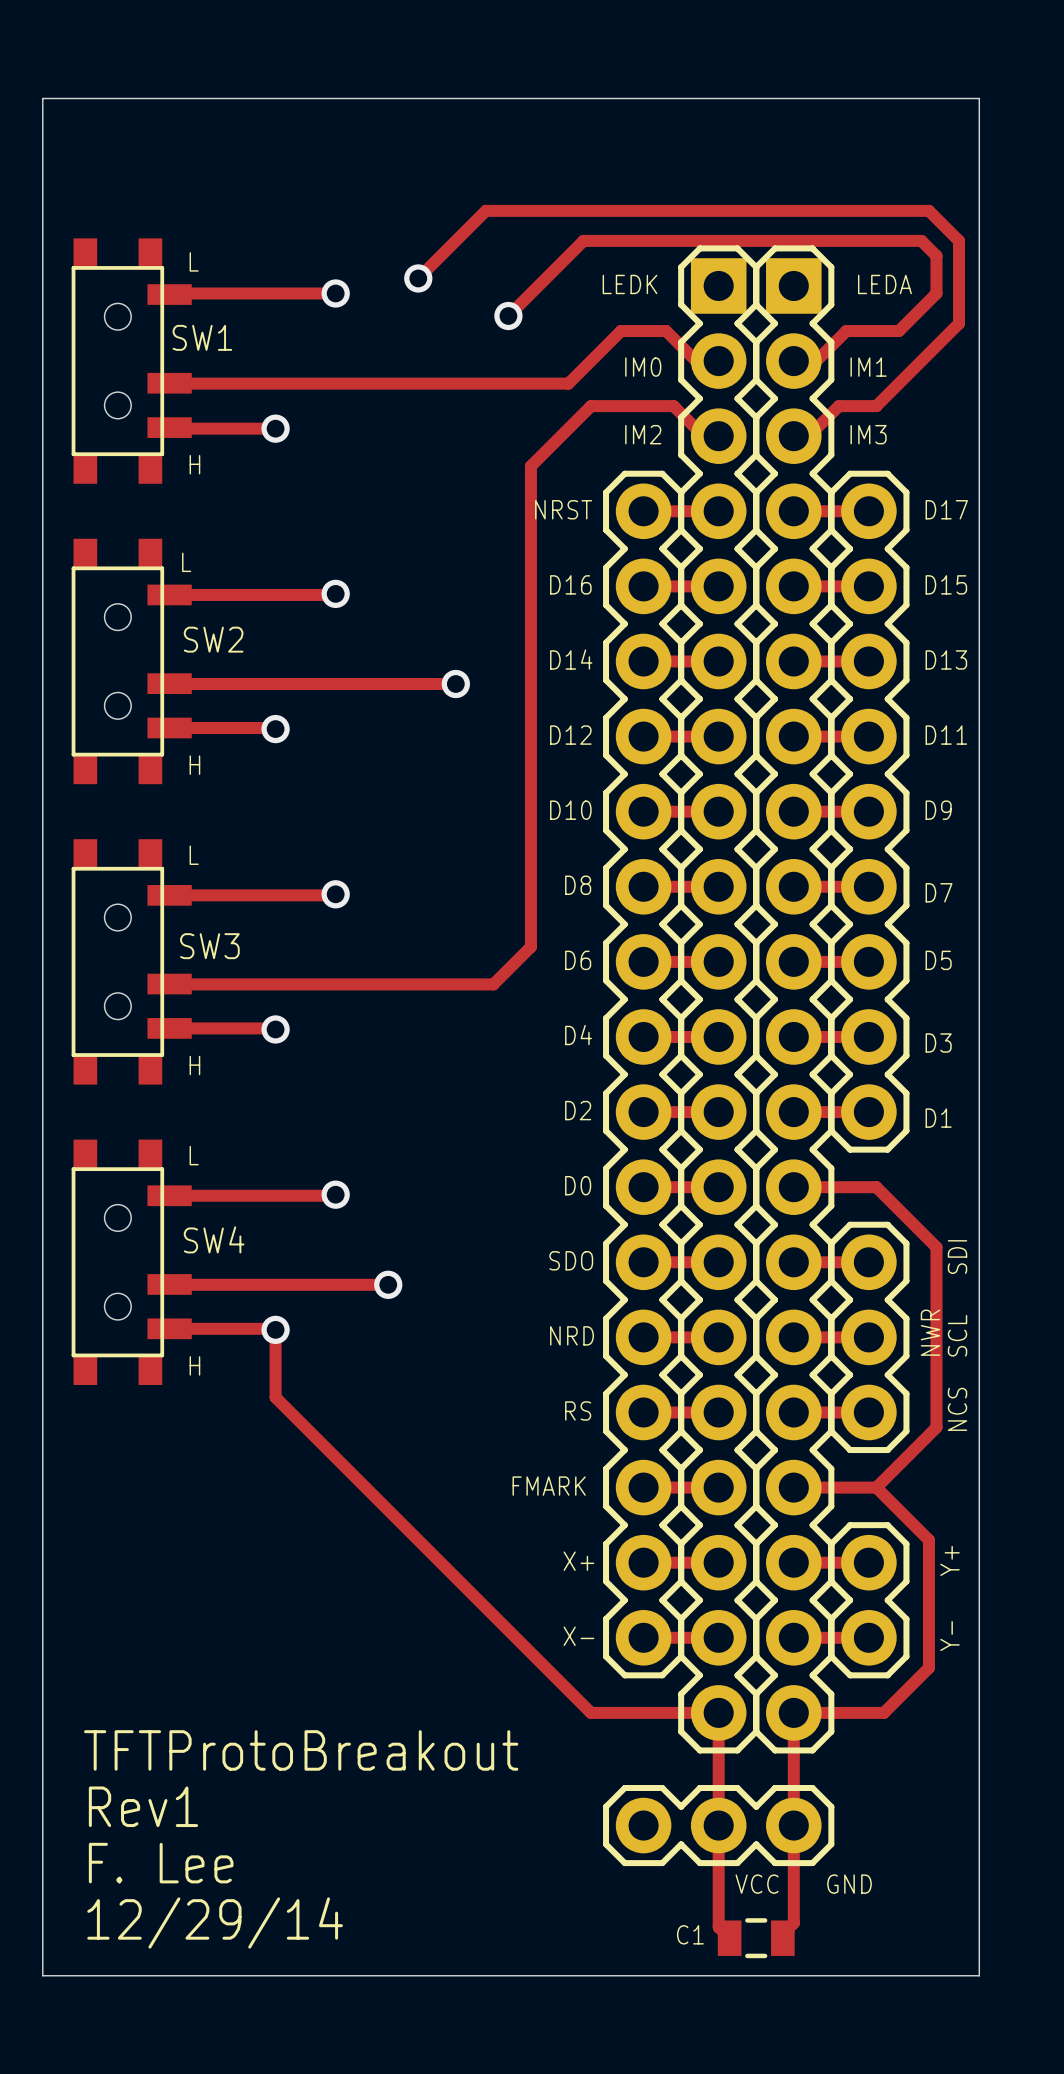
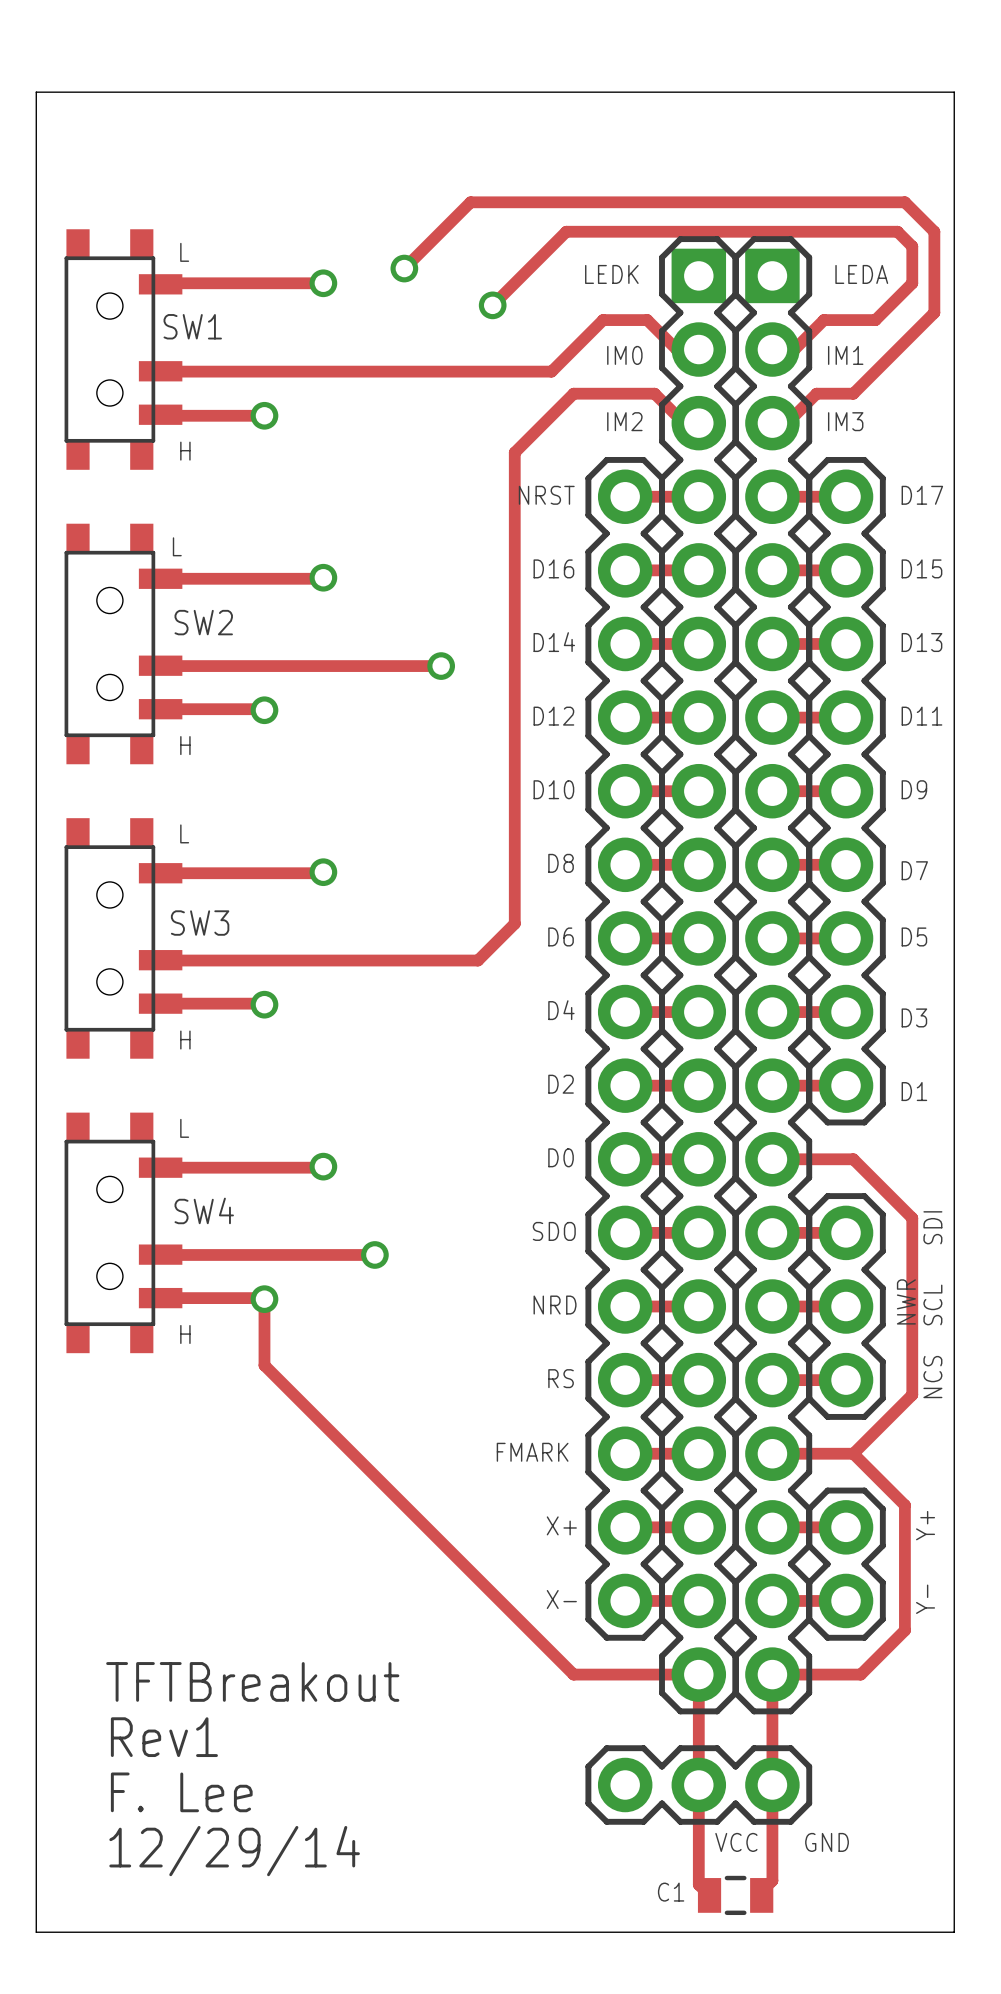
text: TFTProtoBreakout (301, 1750) -> TFTBreakout (252, 1681)
text position: Rev1 (143, 1806) -> Rev1 (164, 1737)
text position: F. Lee (161, 1863) -> F. Lee (181, 1792)
text position: 12/29/14 (215, 1923) -> 12/29/14 (234, 1851)

